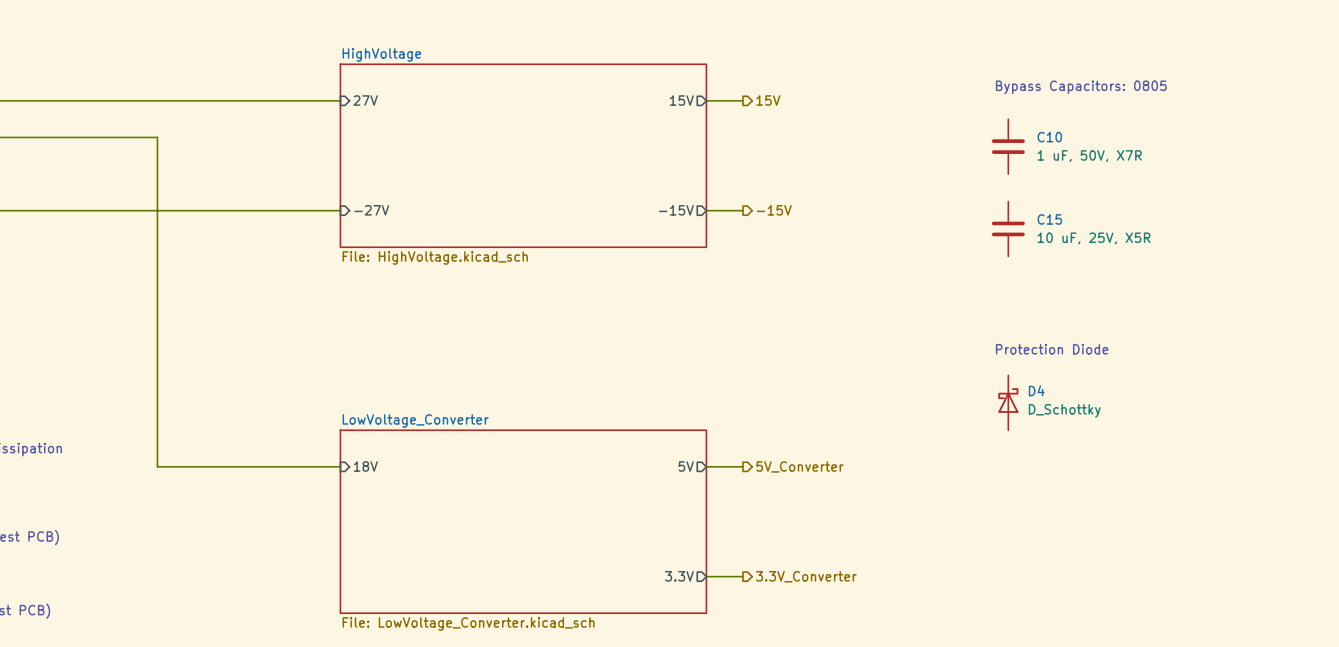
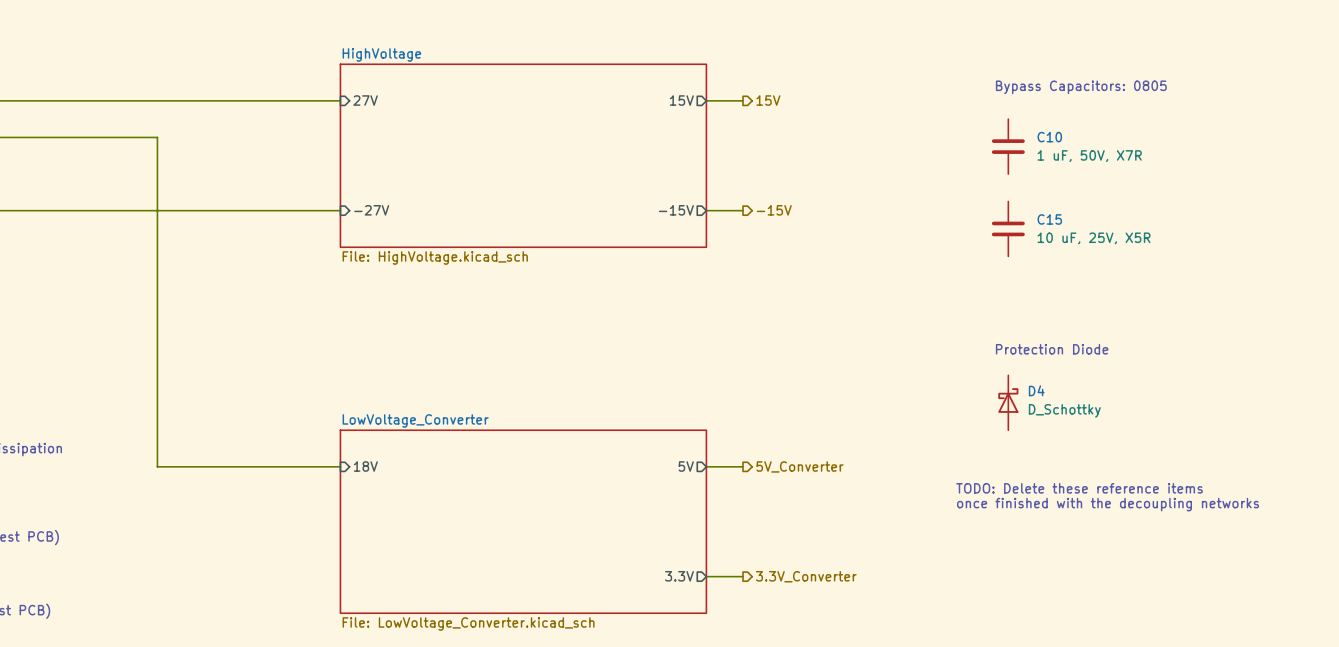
text: none -> TODO: Delete these reference items (1079, 488)
text: none -> once finished with the decoupling networks (1108, 504)

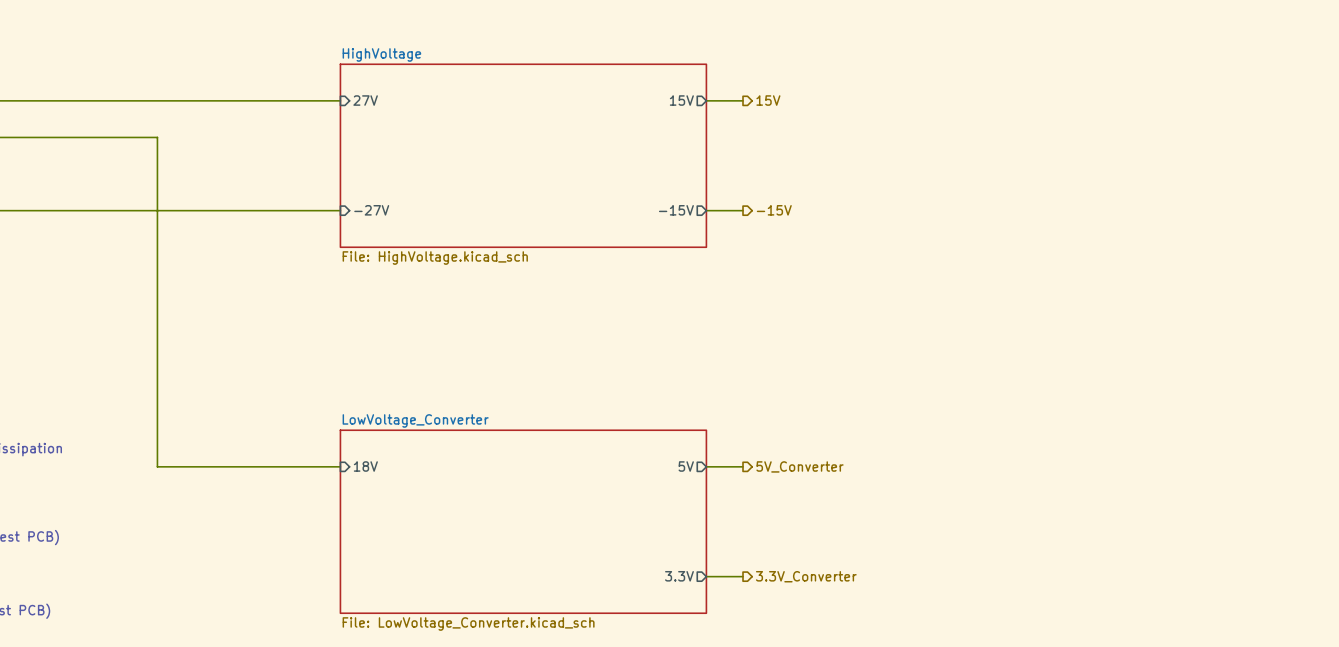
text: Bypass Capacitors: 0805 (1081, 87) -> none
C10: 1 uF, 50V, X7R (1008, 146) -> none
C15: 10 uF, 25V, X5R (1008, 228) -> none
text: Protection Diode (1052, 349) -> none
D4: D_Schottky (1008, 402) -> none
text: TODO: Delete these reference items (1079, 488) -> none
text: once finished with the decoupling networks (1108, 504) -> none

